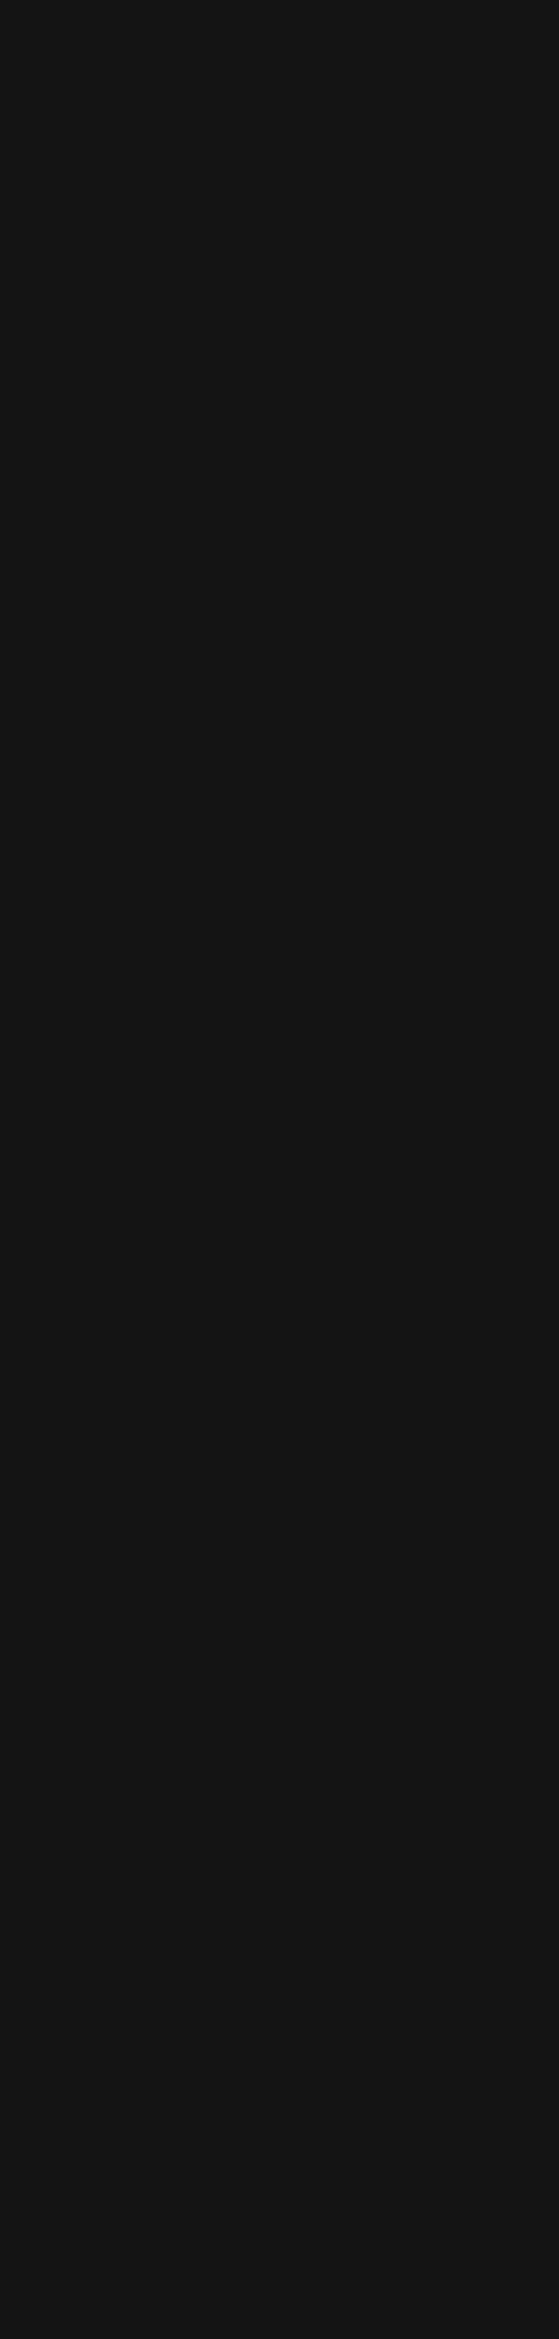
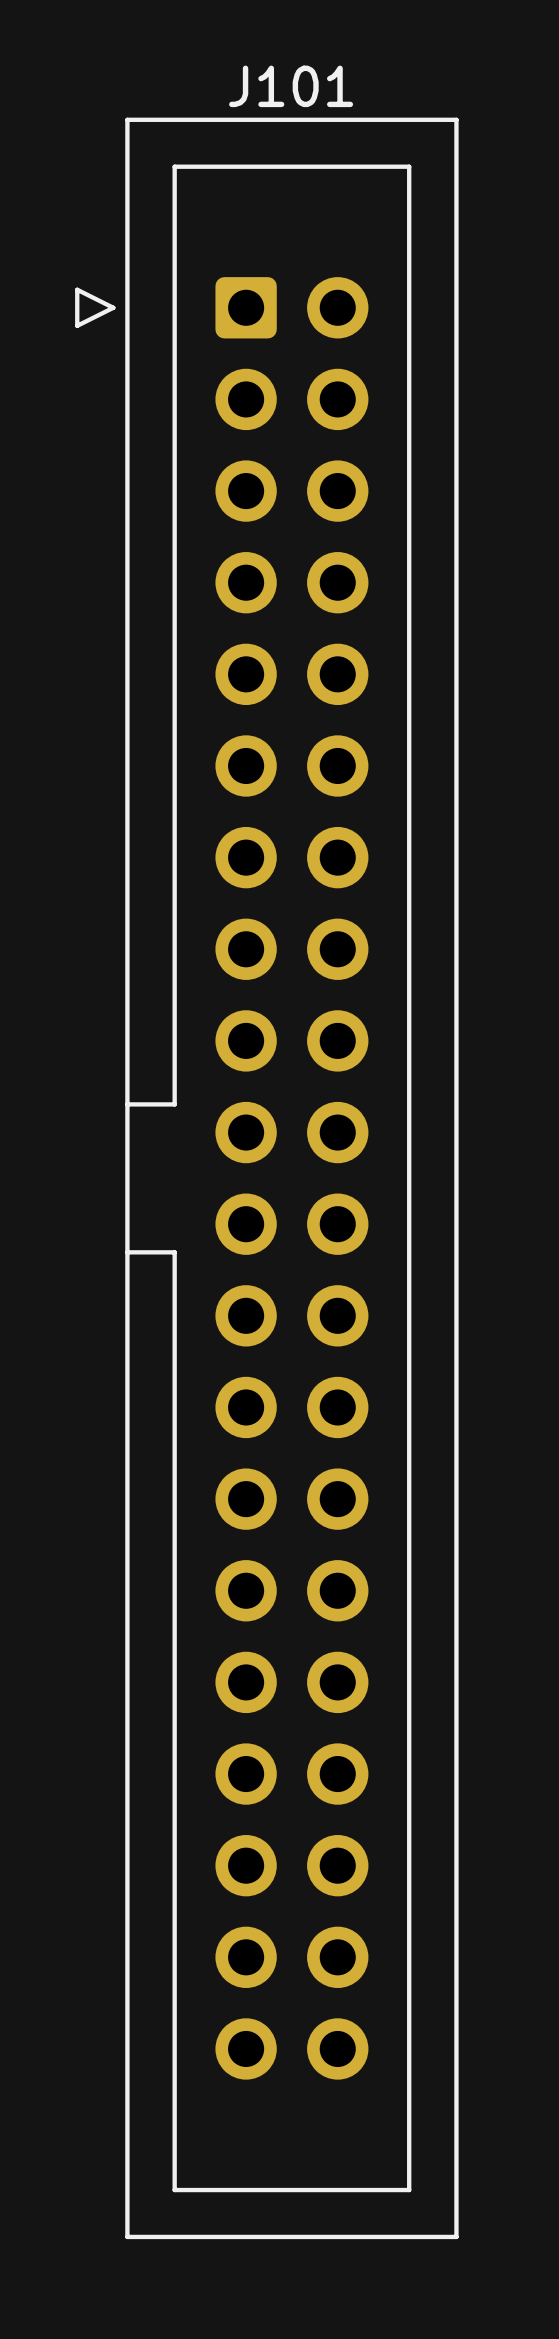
J101: none -> (266, 1178)

